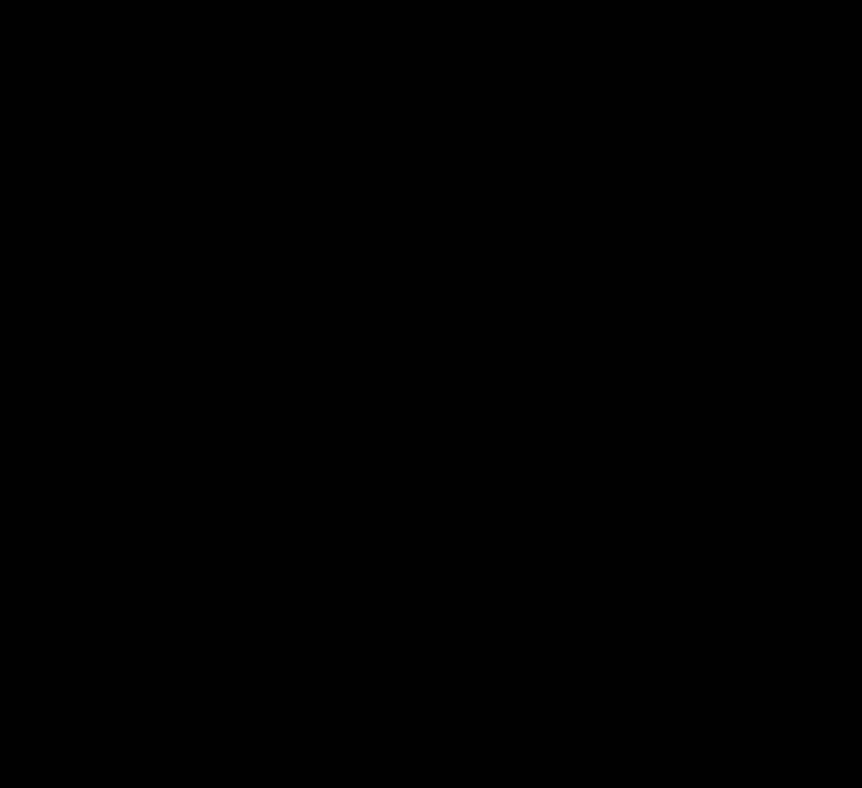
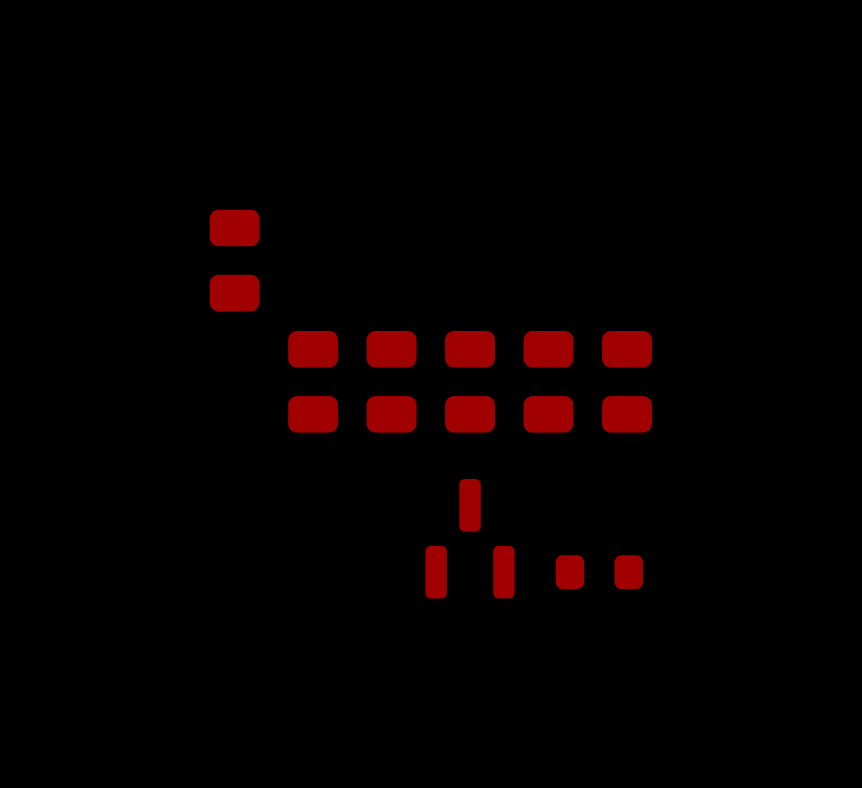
part: none -> (234, 260)
part: none -> (313, 381)
part: none -> (391, 381)
part: none -> (470, 381)
part: none -> (548, 381)
part: none -> (627, 381)
part: none -> (470, 538)
part: none -> (599, 572)

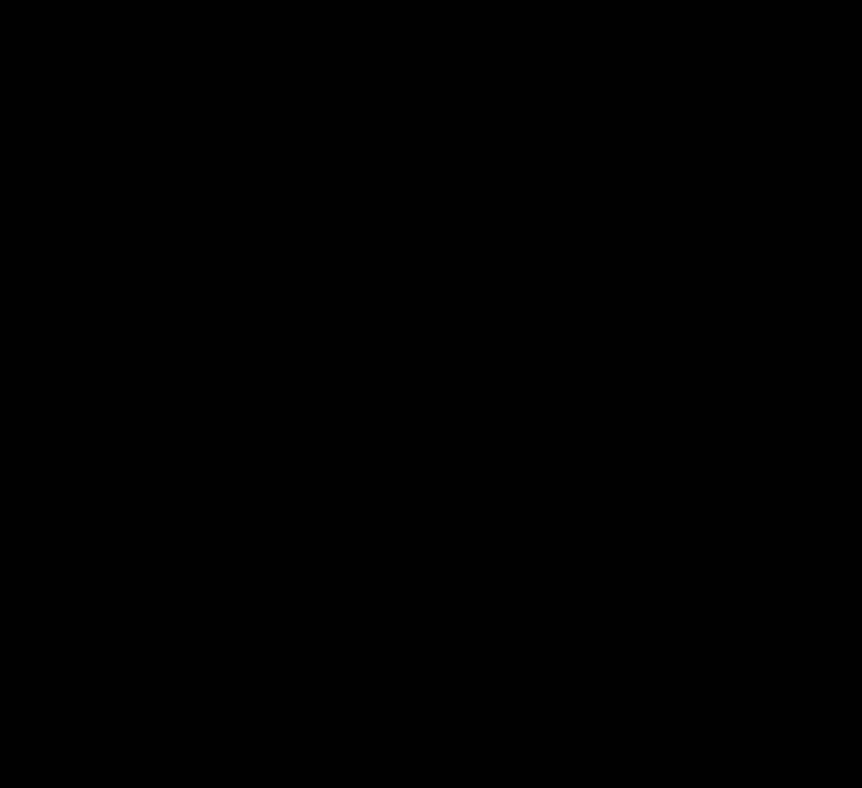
part: (234, 260) -> none
part: (313, 381) -> none
part: (391, 381) -> none
part: (470, 381) -> none
part: (548, 381) -> none
part: (627, 381) -> none
part: (470, 538) -> none
part: (599, 572) -> none

